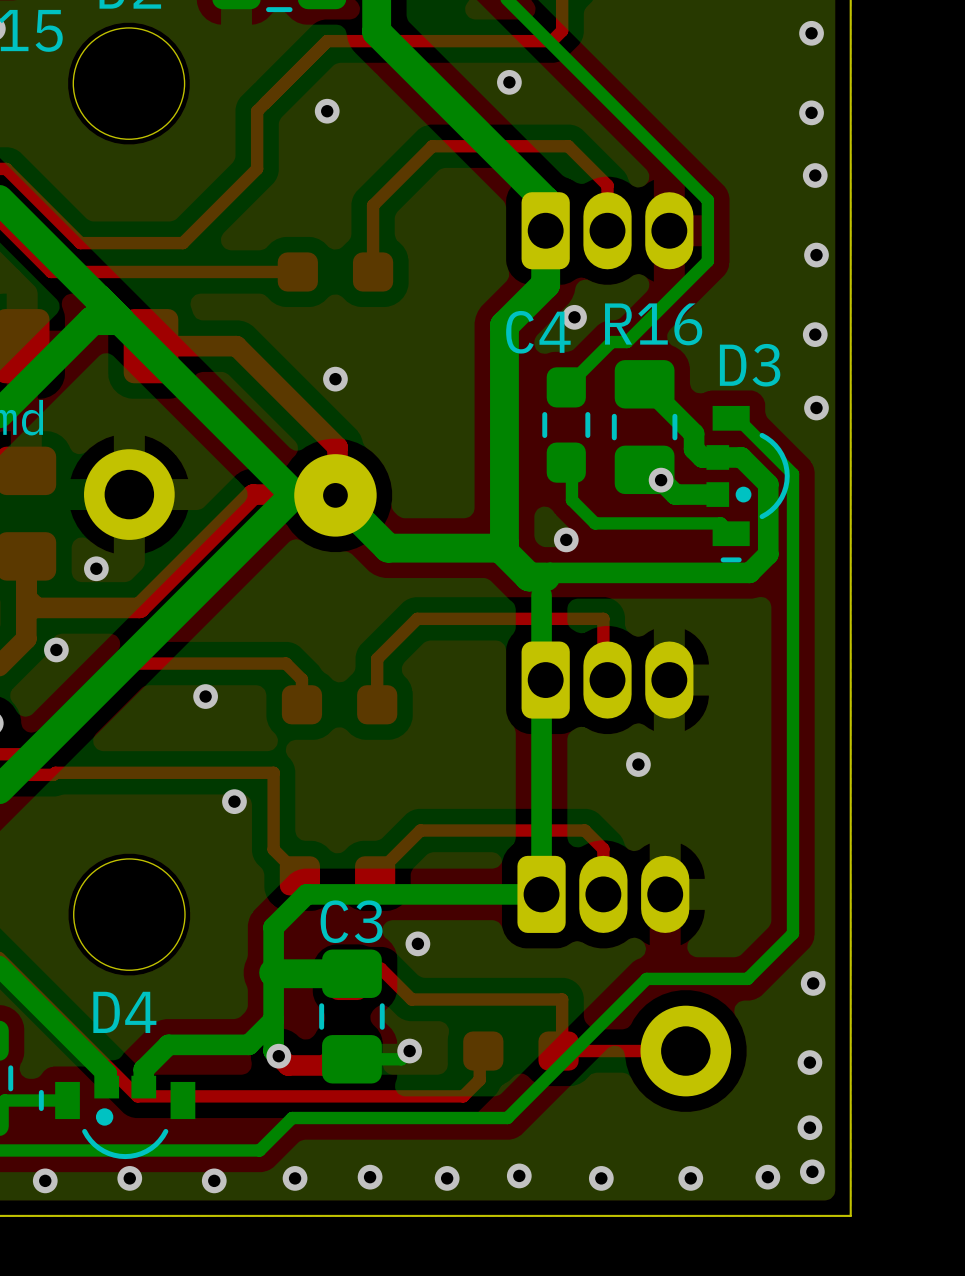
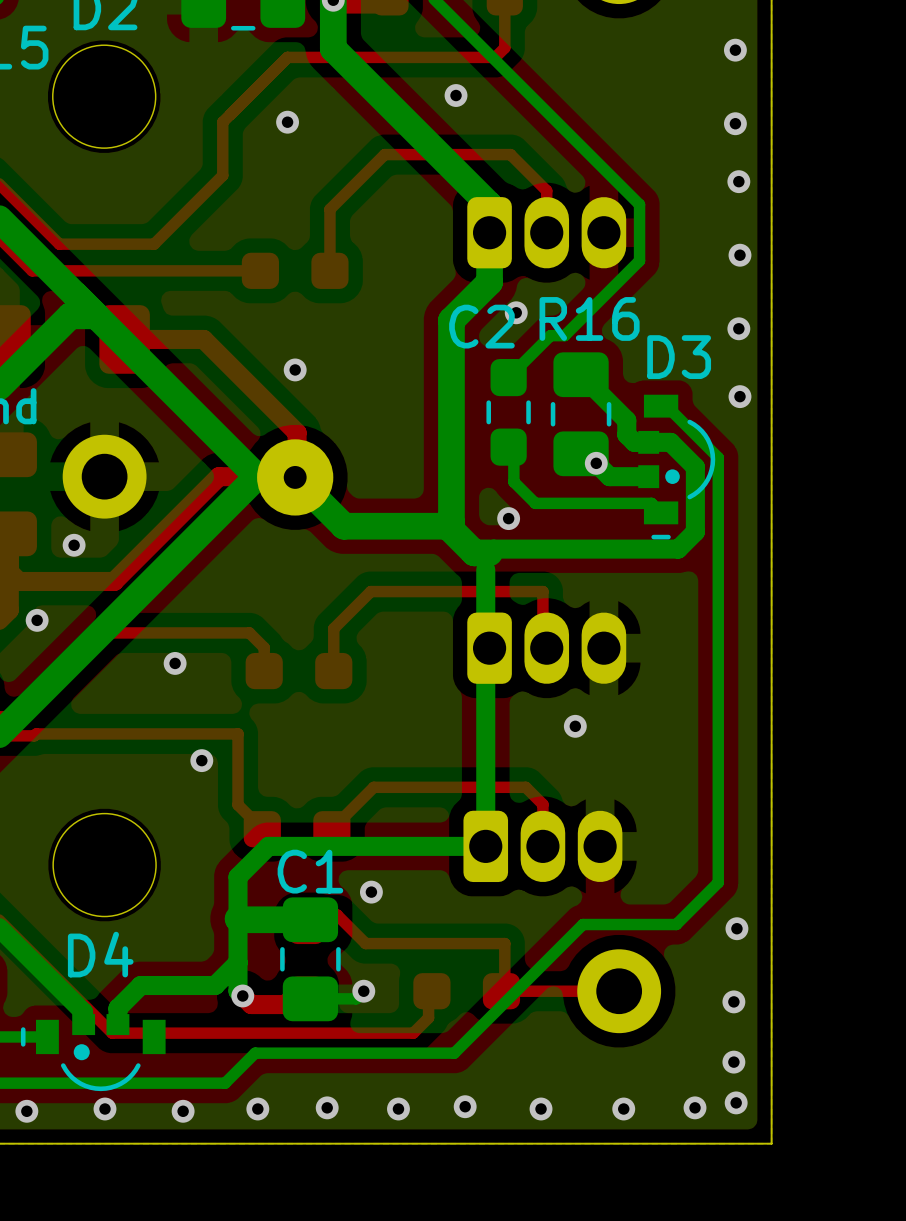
C4 name: C4 (538, 332) -> C2 (481, 326)
C3 name: C3 (351, 921) -> C1 (310, 871)

